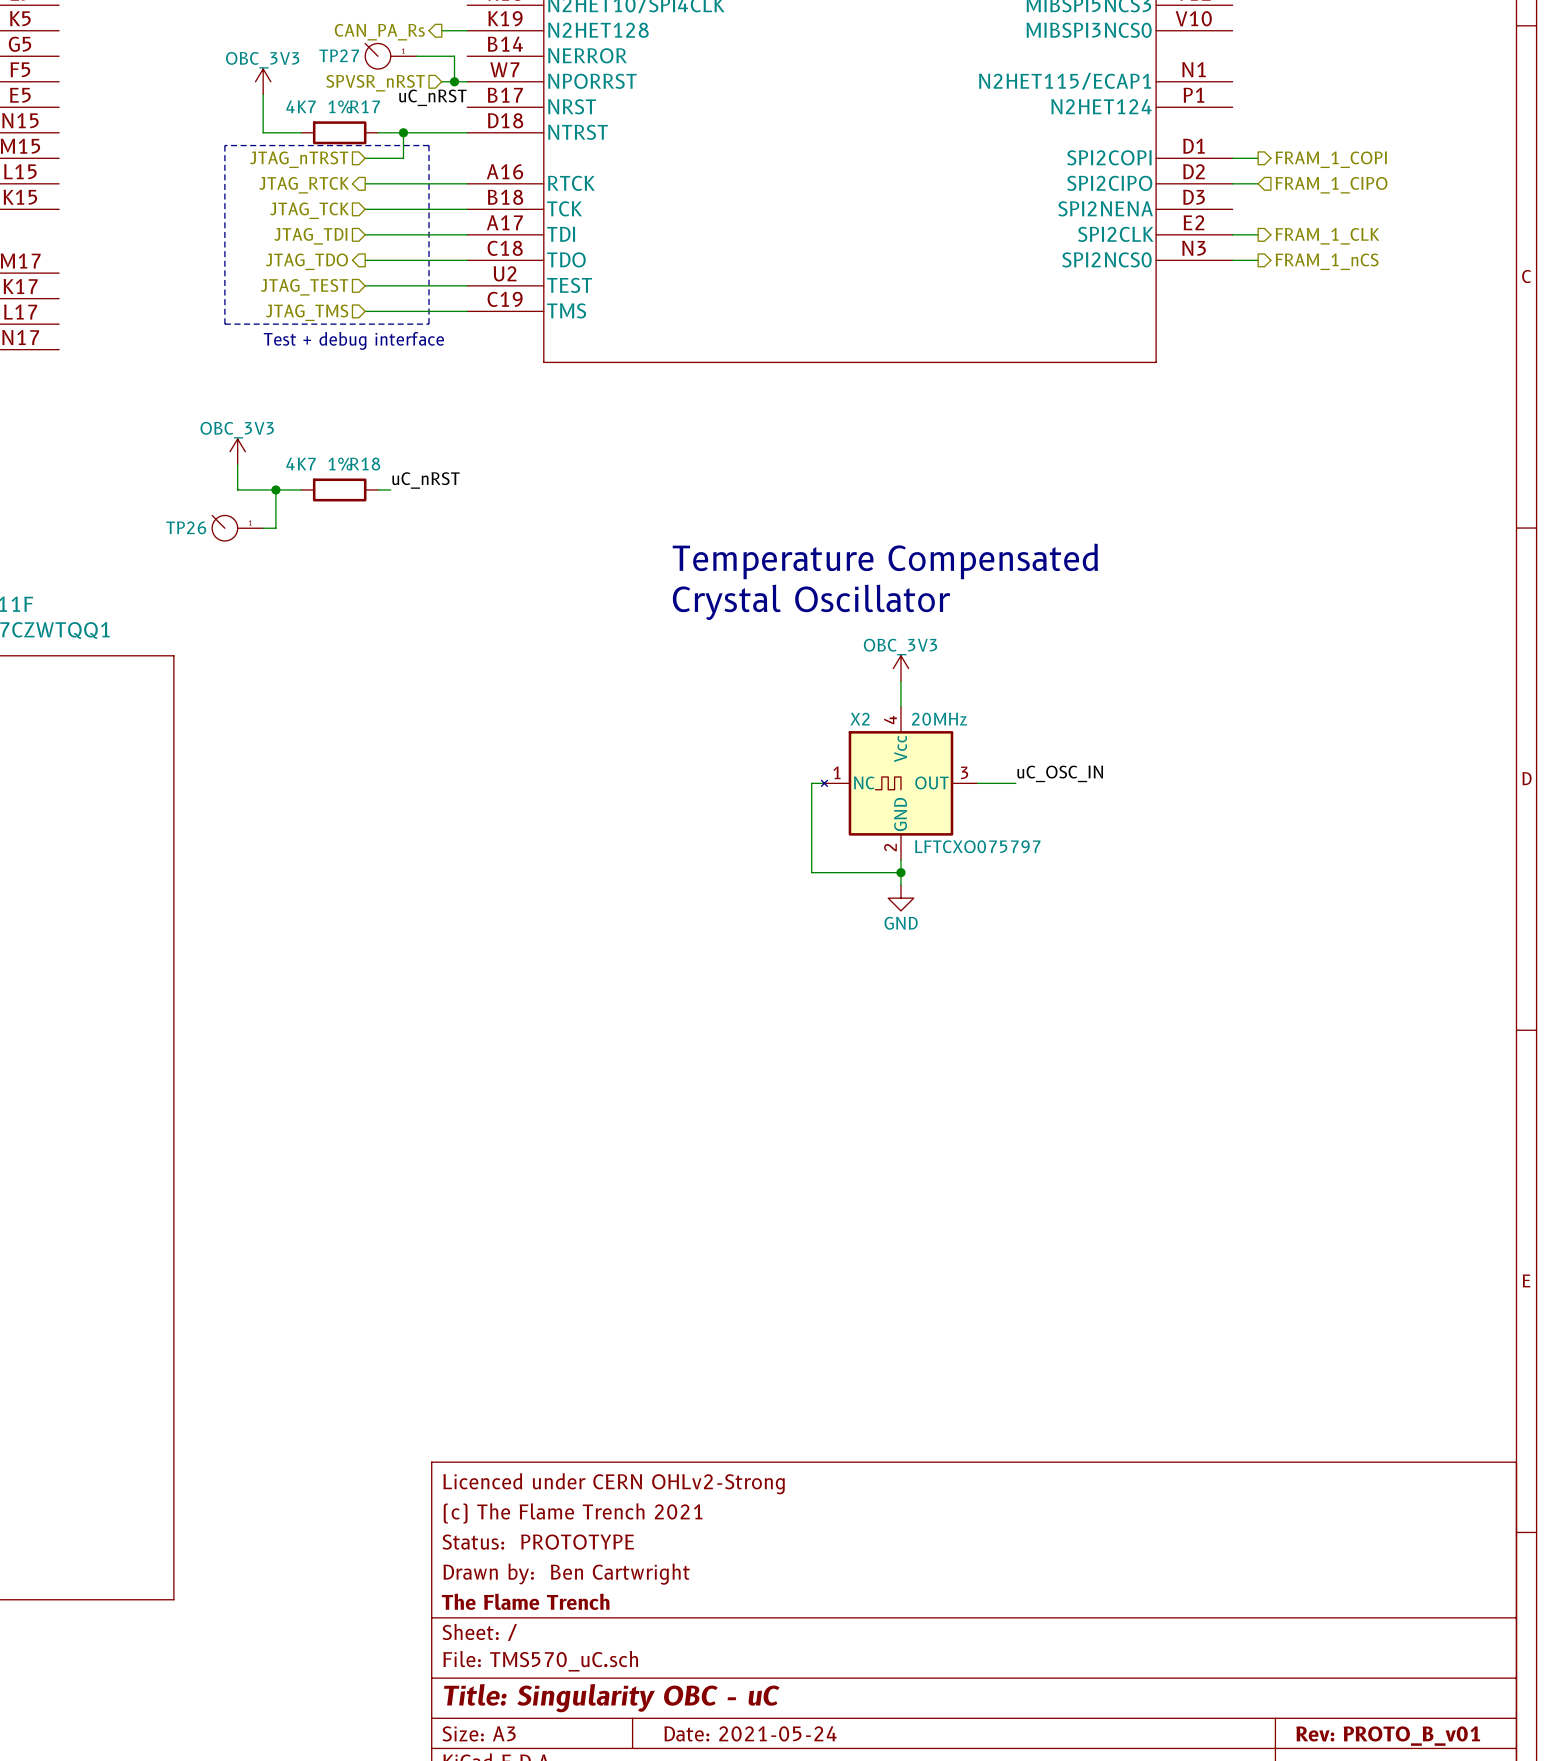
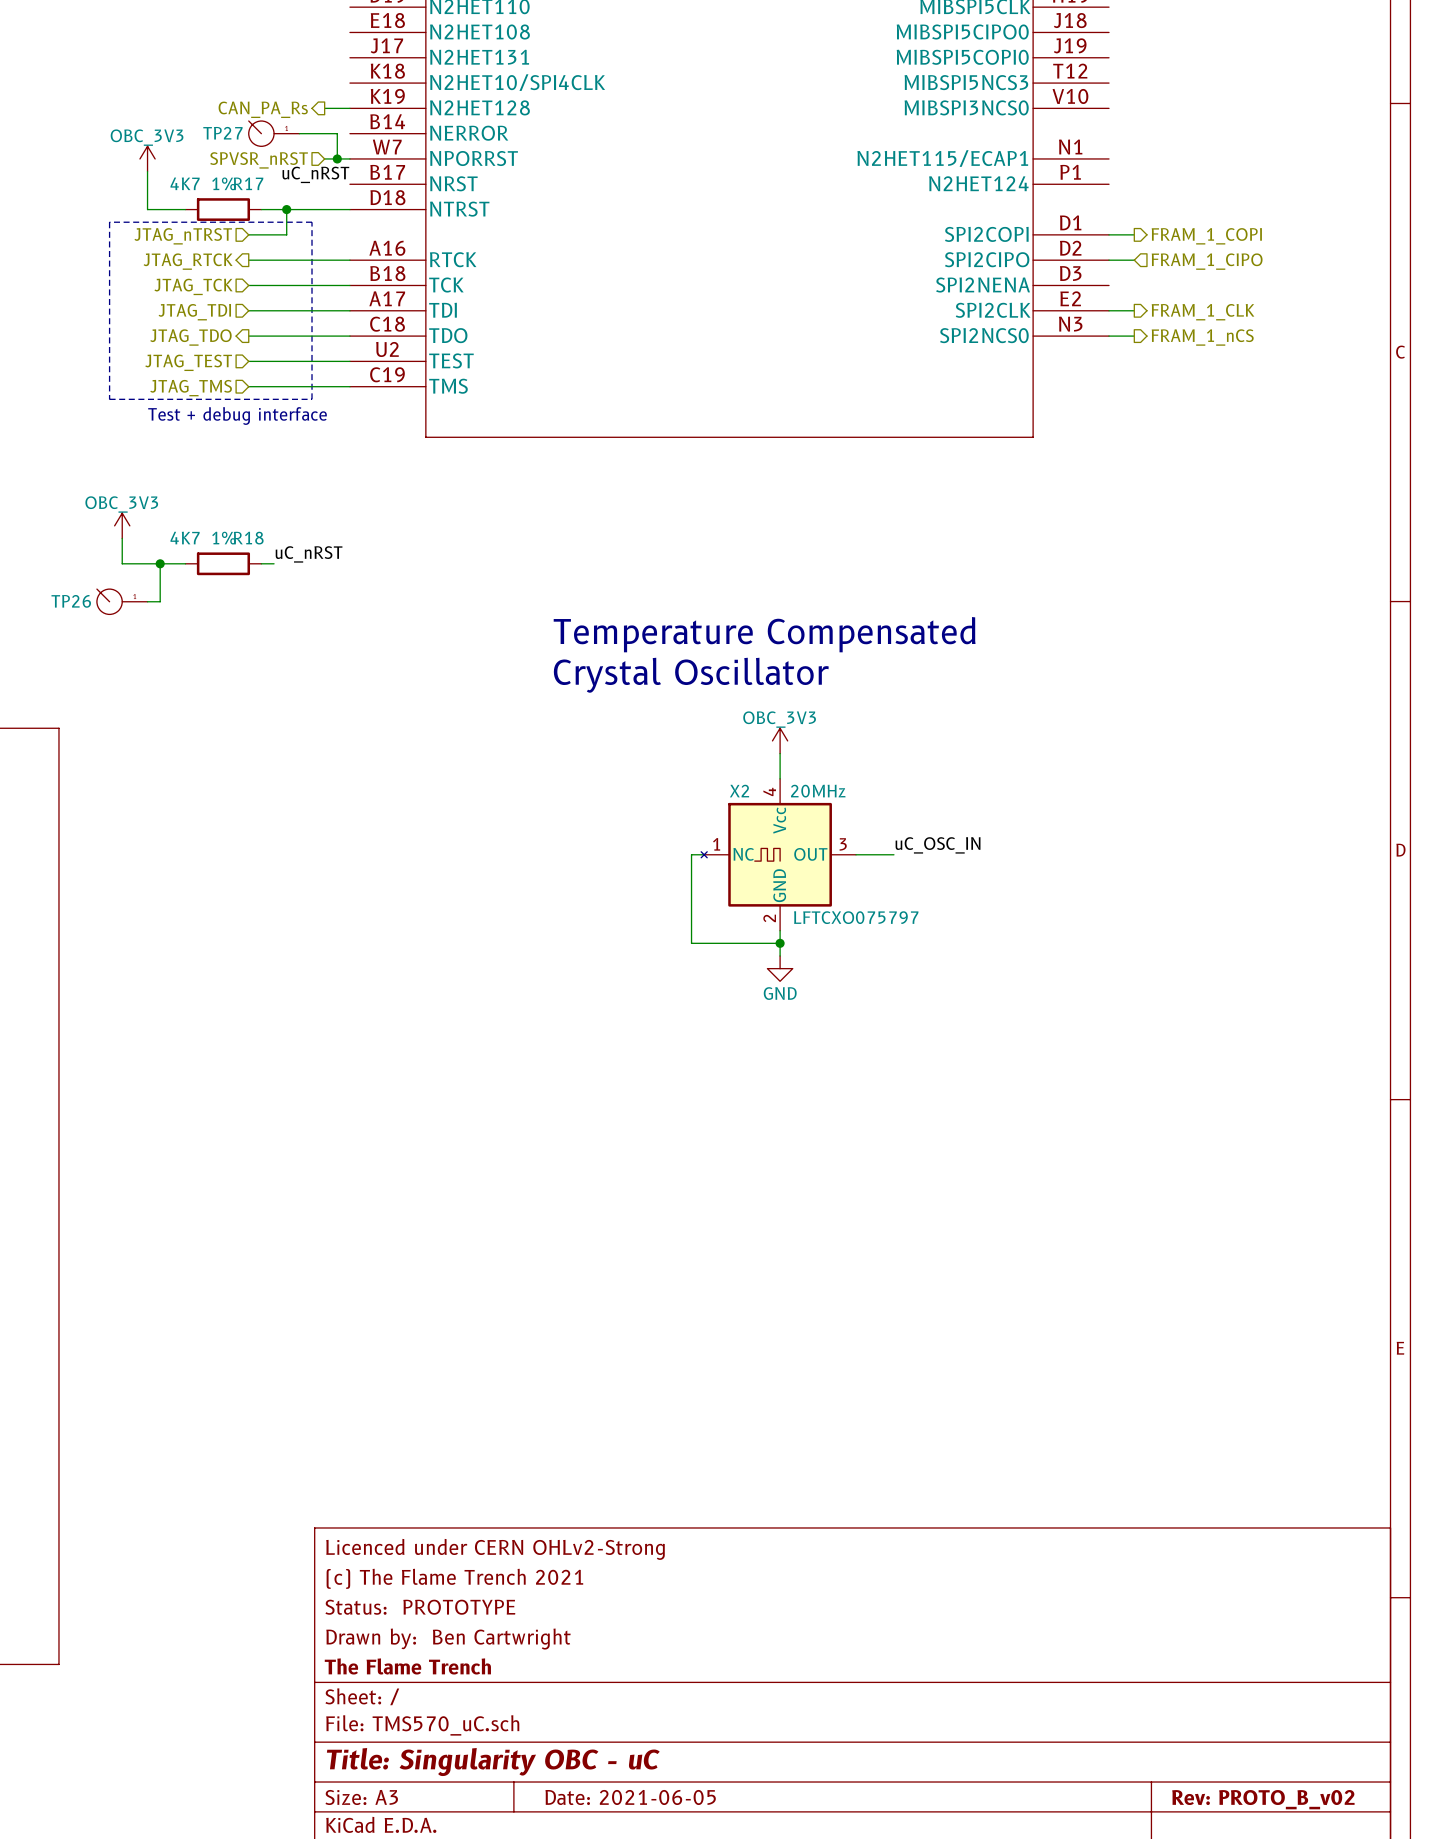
title block: Date: 2021-05-24 (750, 1733) -> Date: 2021-06-05 (630, 1797)
title block: Rev: PROTO_B_v01 (1388, 1736) -> Rev: PROTO_B_v02 (1263, 1799)

